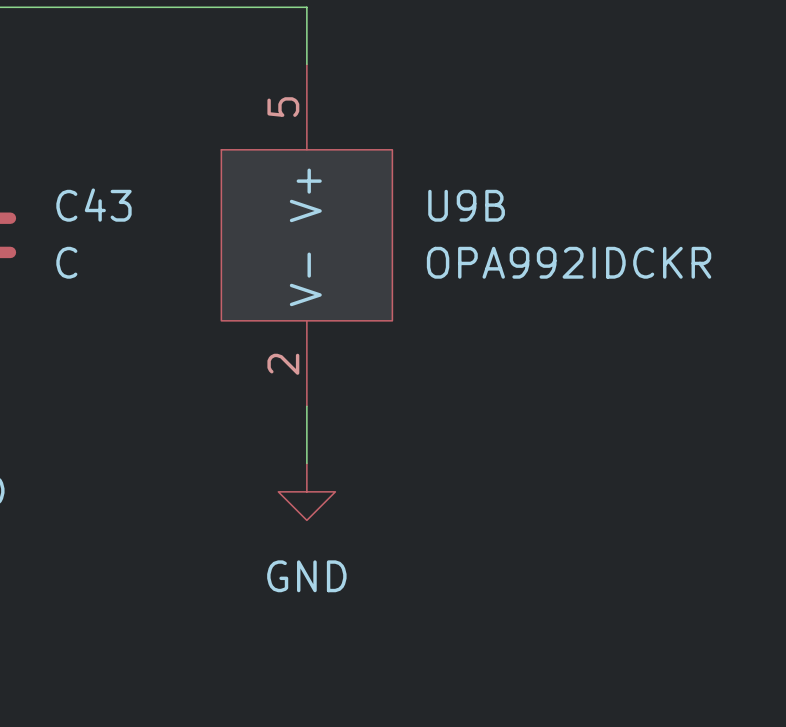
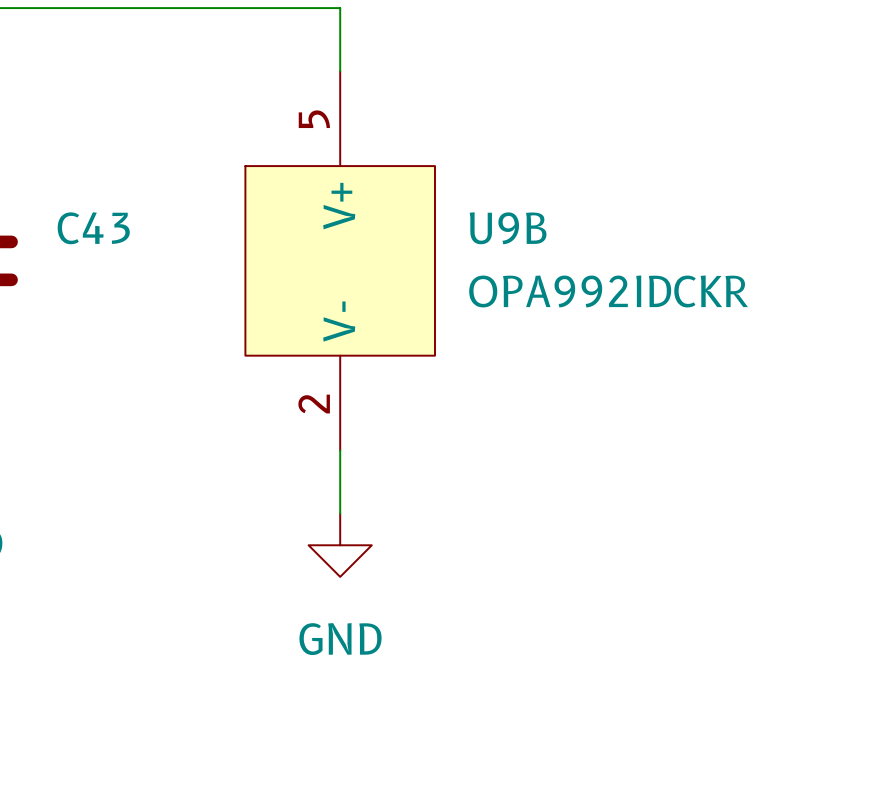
C43 value: C (66, 262) -> none

